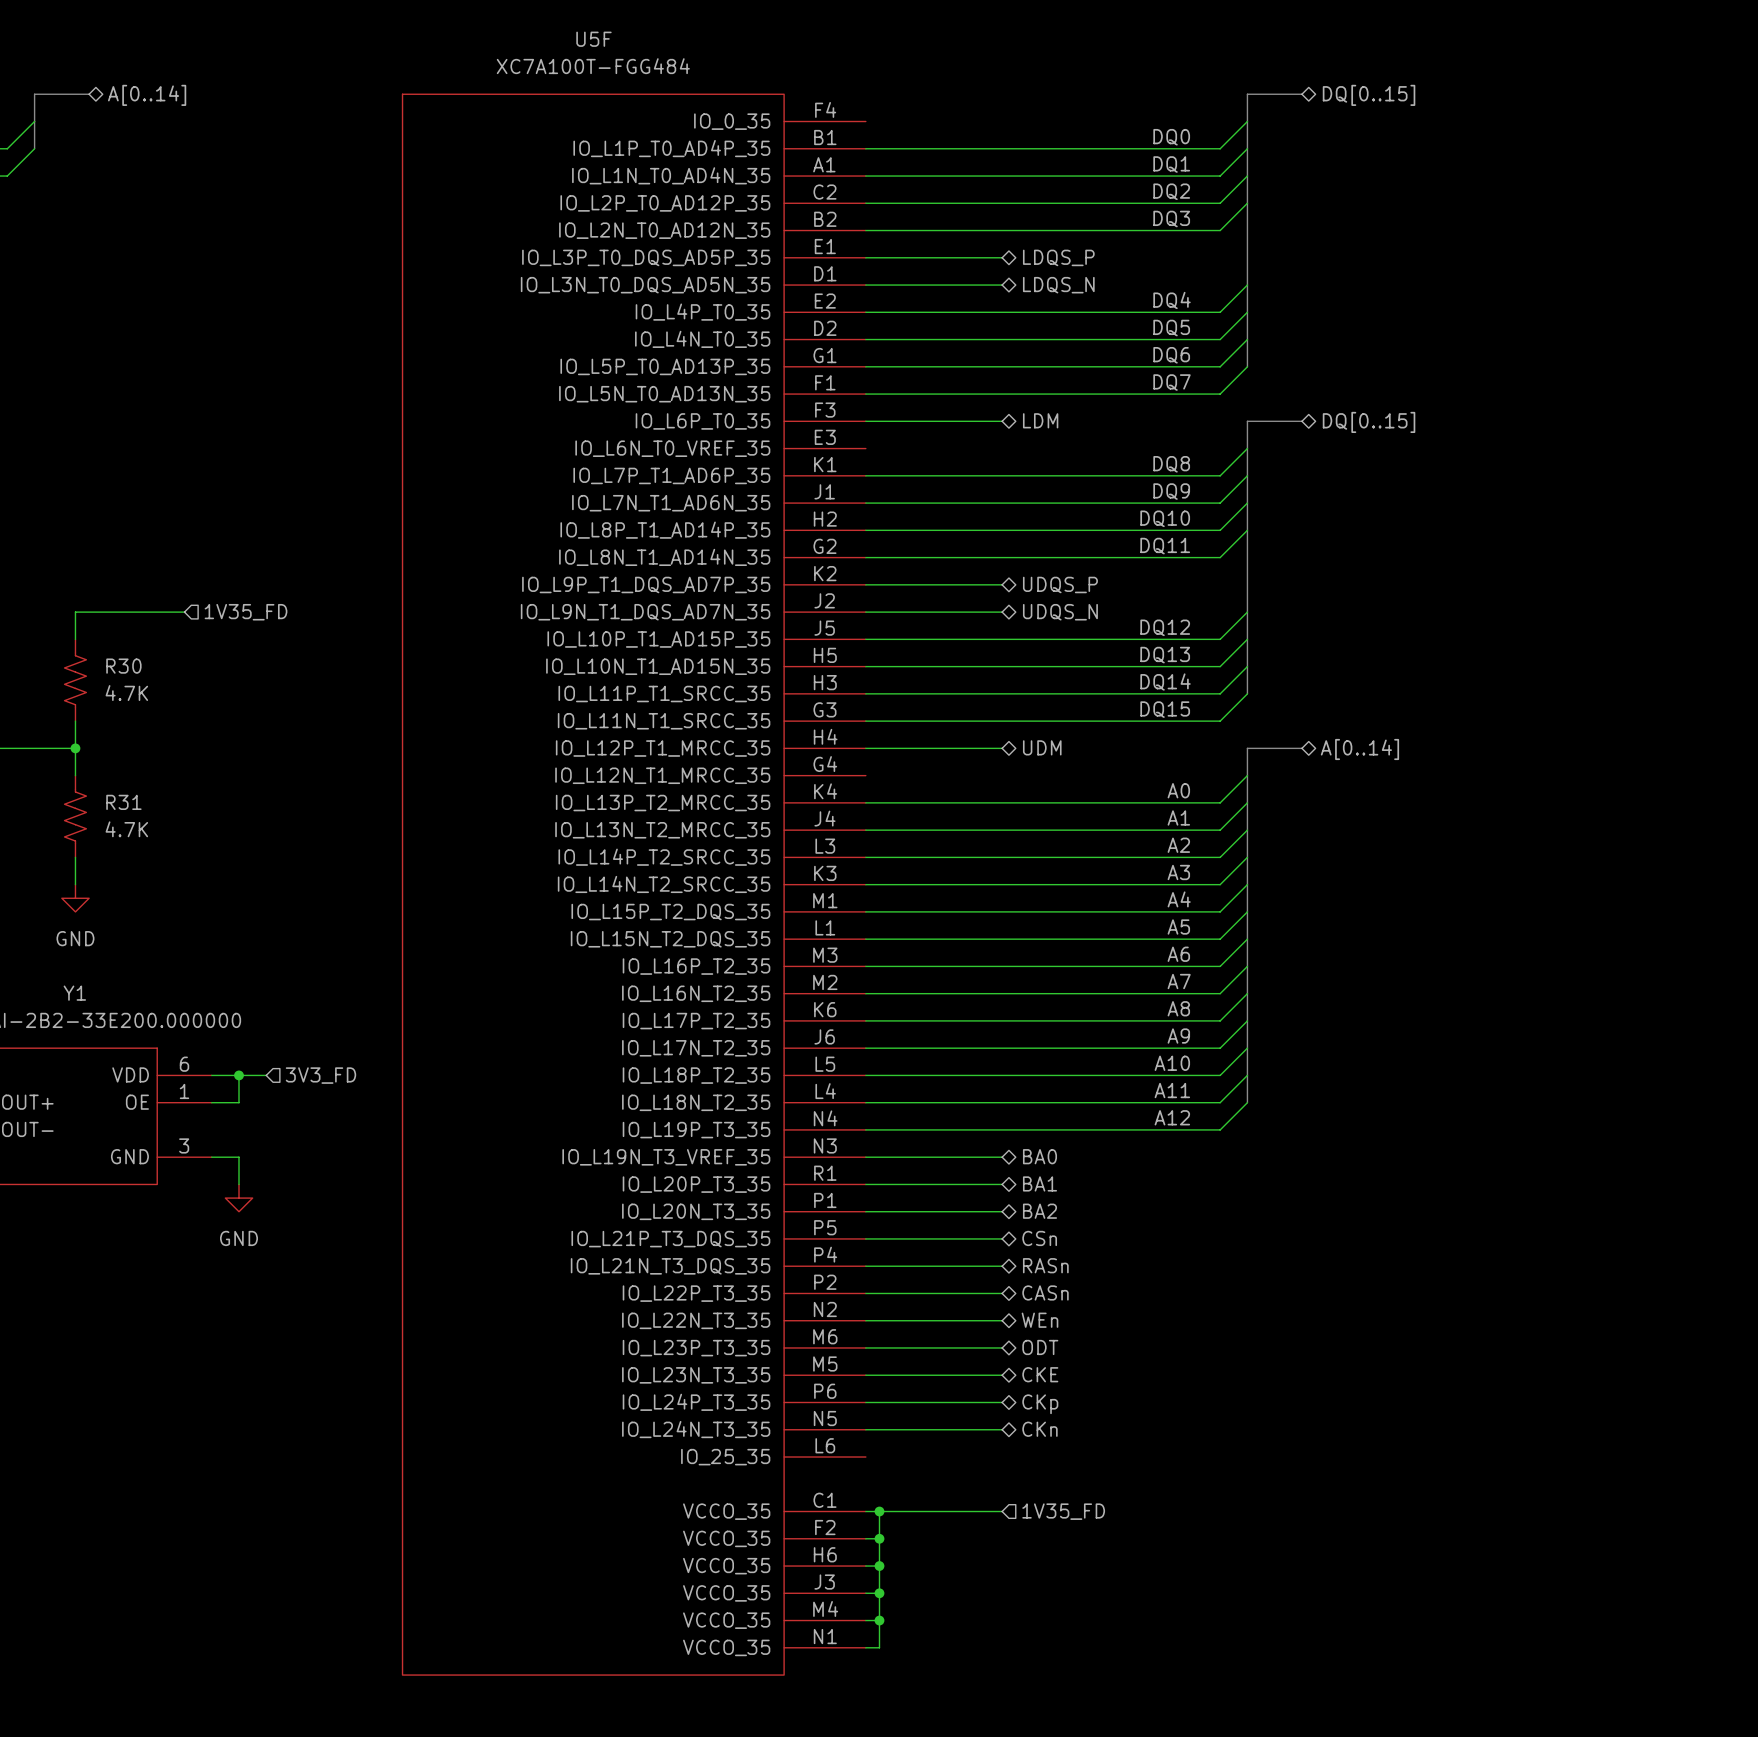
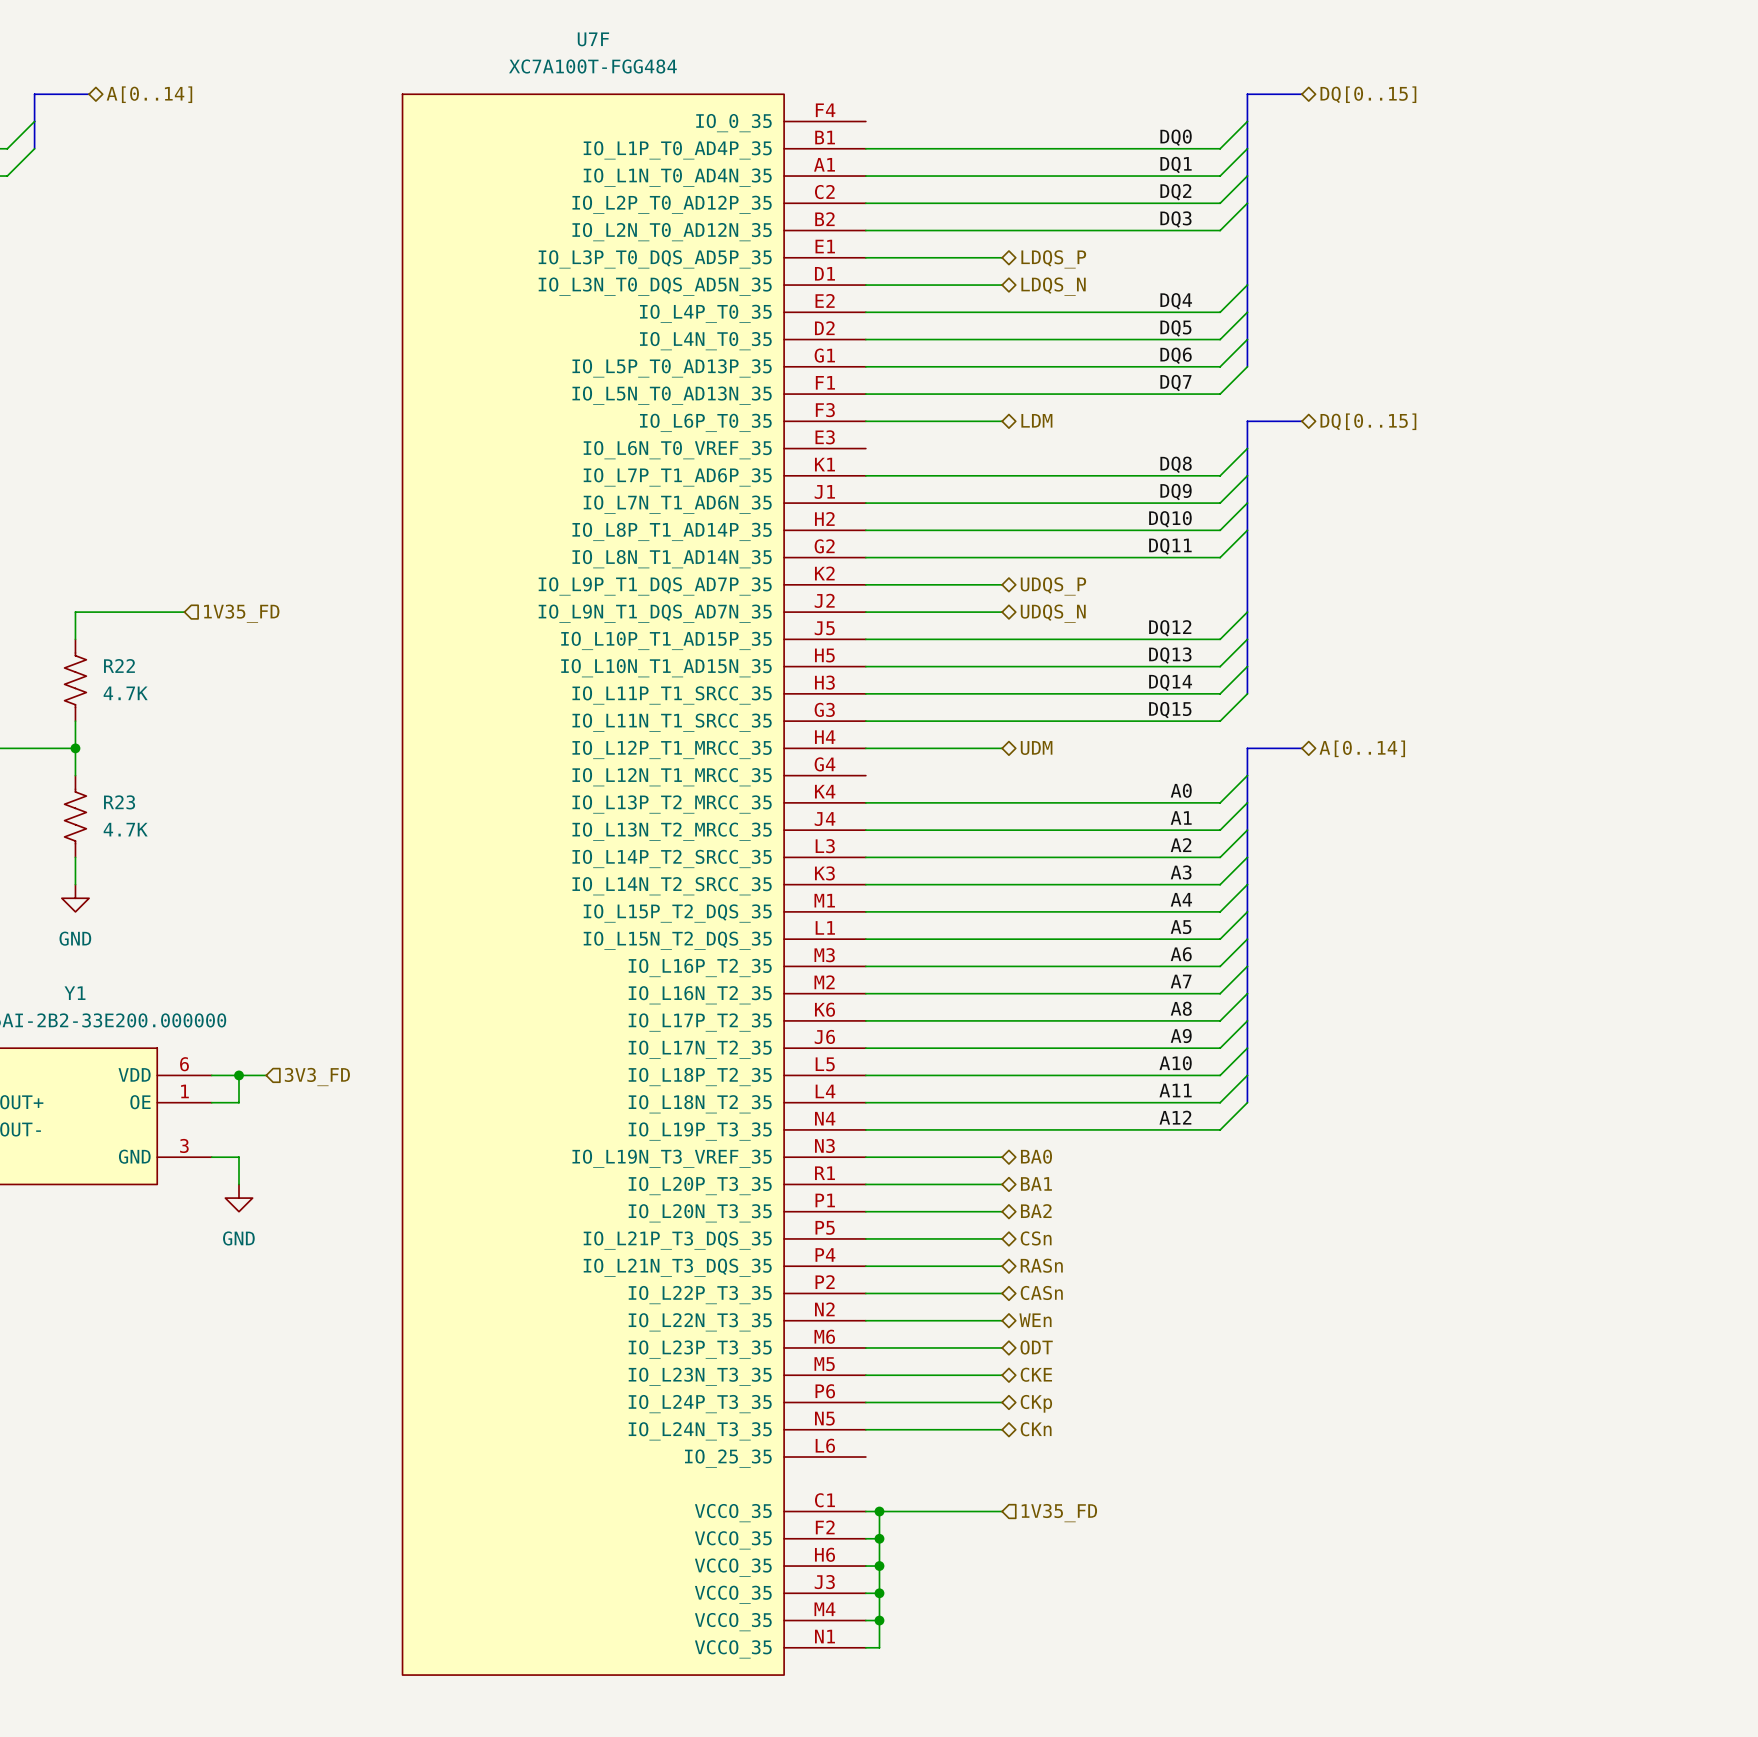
U5F name: U5F (593, 39) -> U7F (593, 39)
R30 name: R30 (123, 666) -> R22 (119, 665)
R31 name: R31 (123, 802) -> R23 (119, 802)

